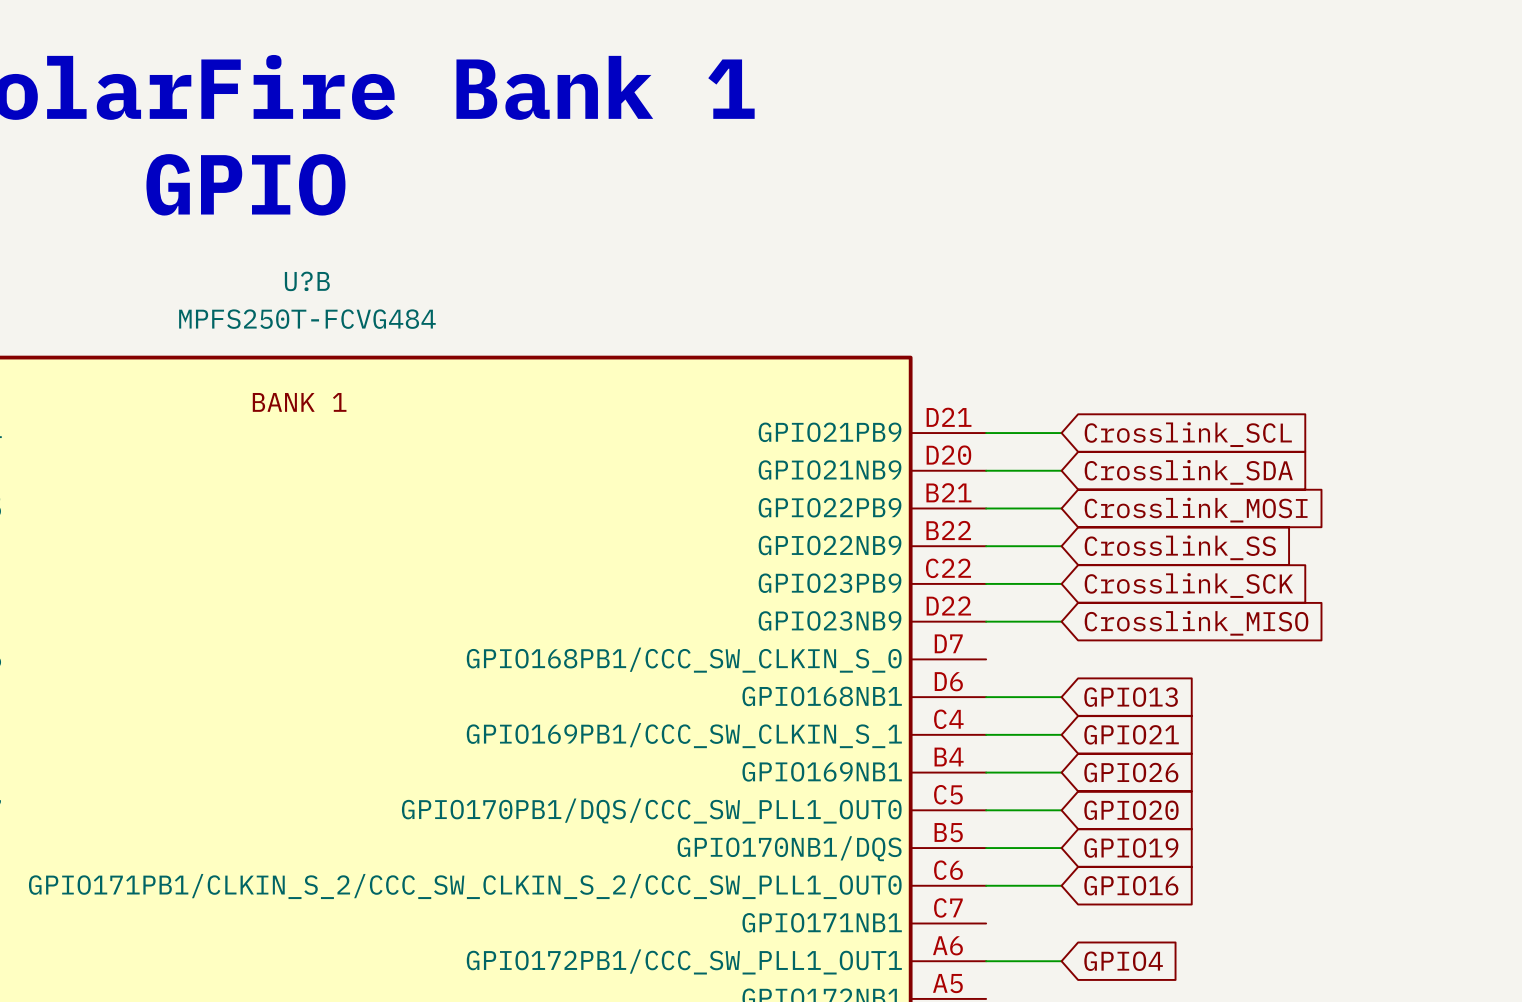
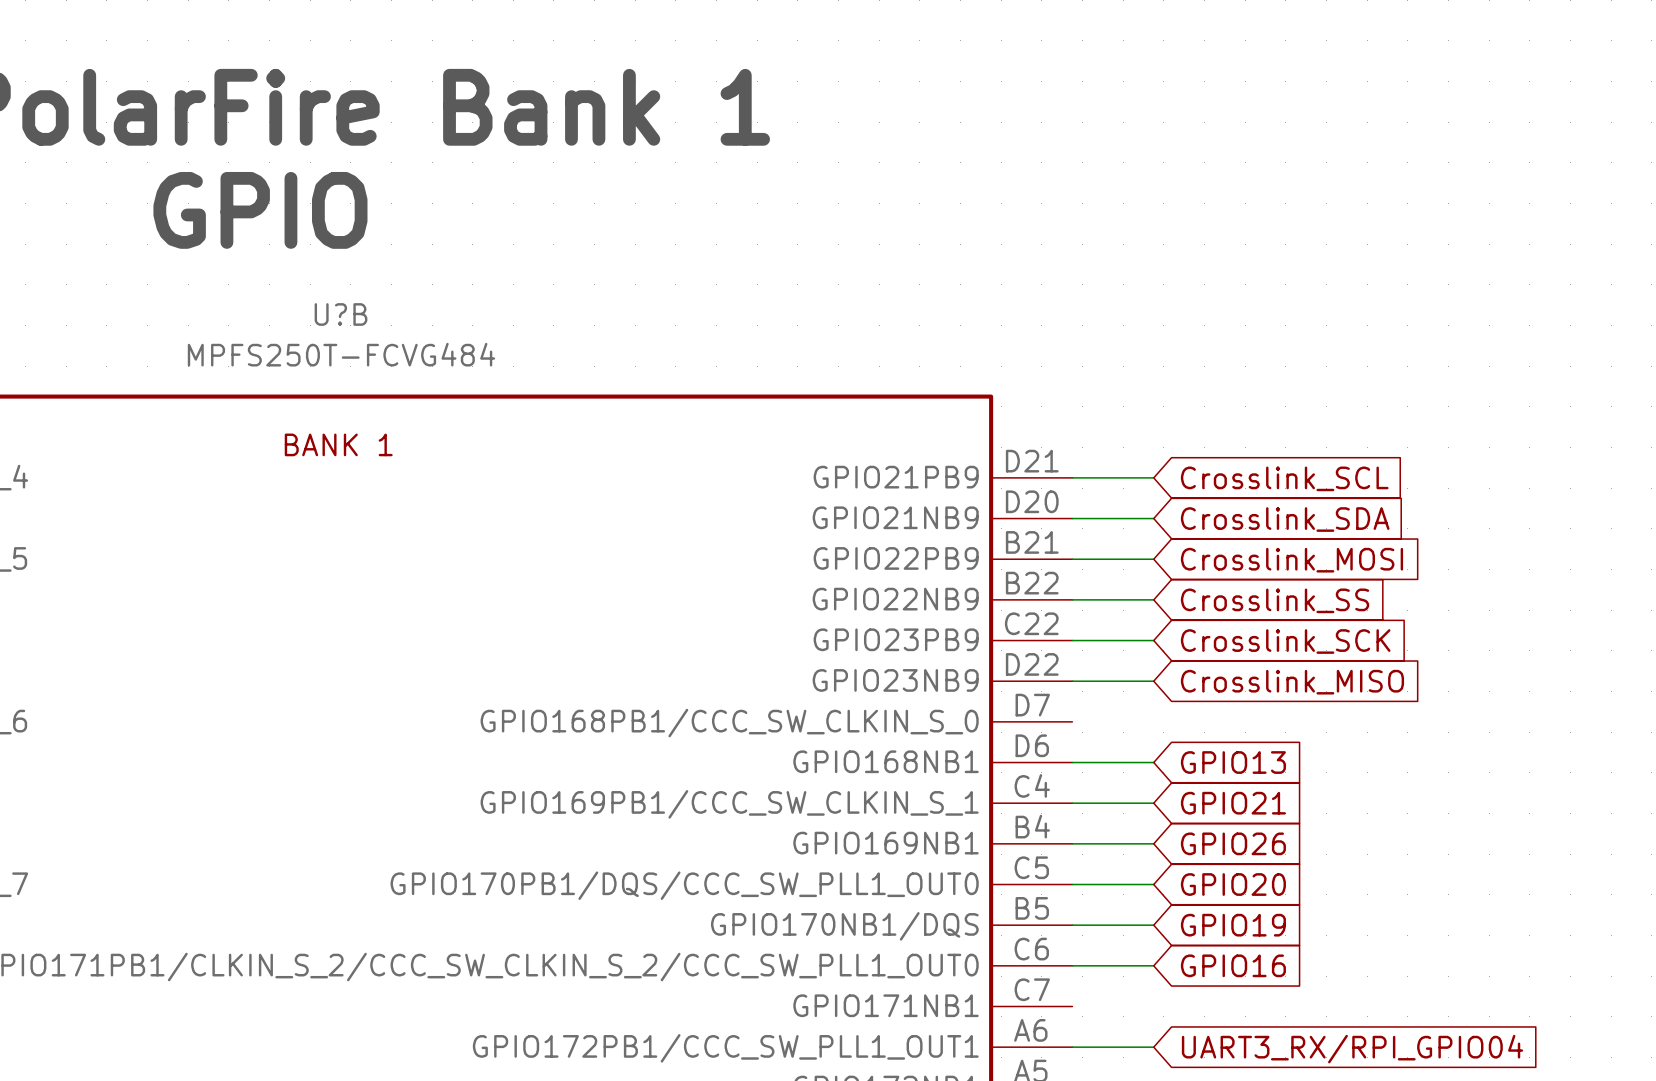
global label: GPIO4 (1123, 961) -> UART3_RX/RPI_GPIO04 (1352, 1049)

